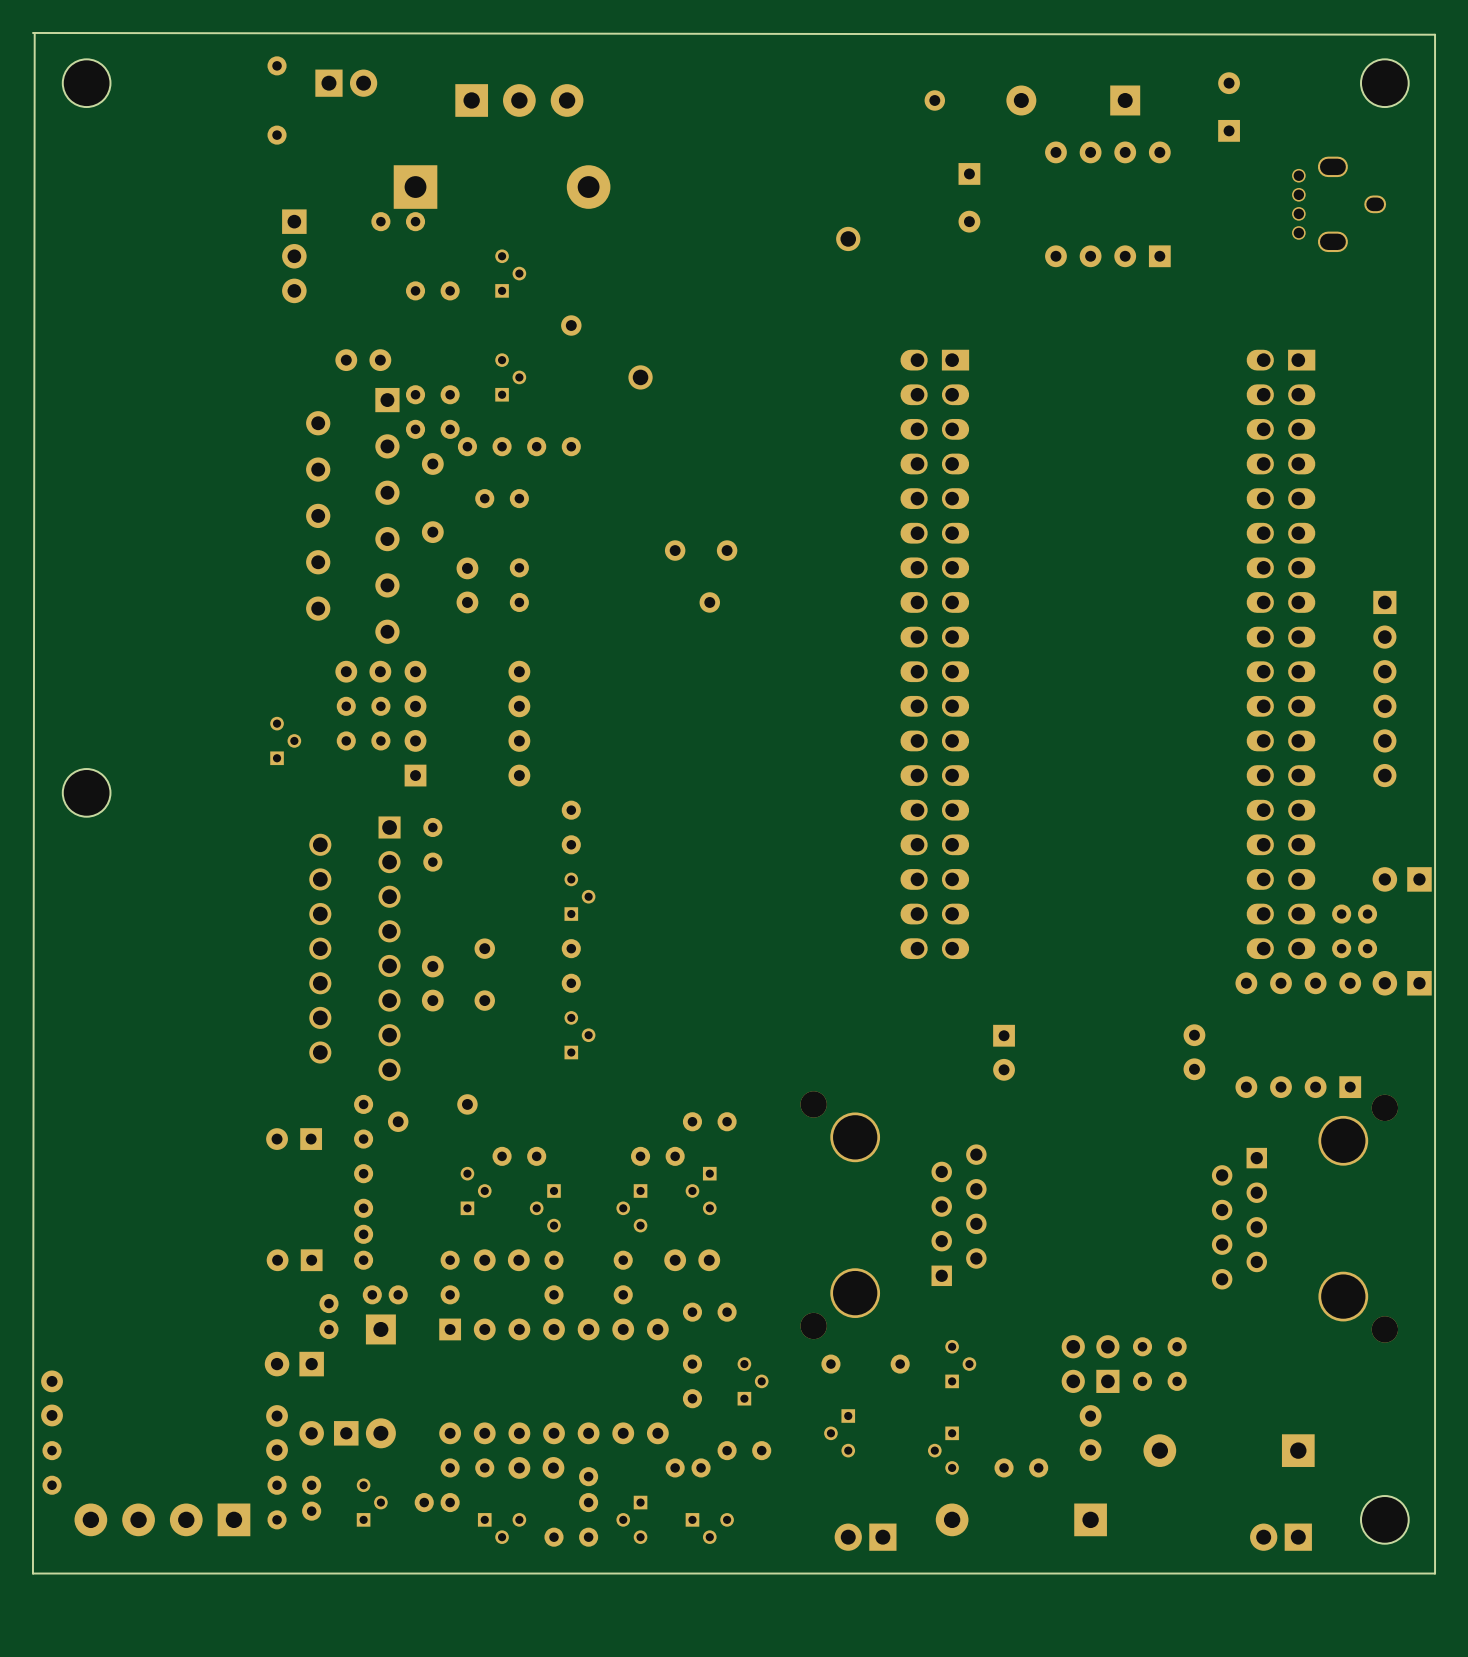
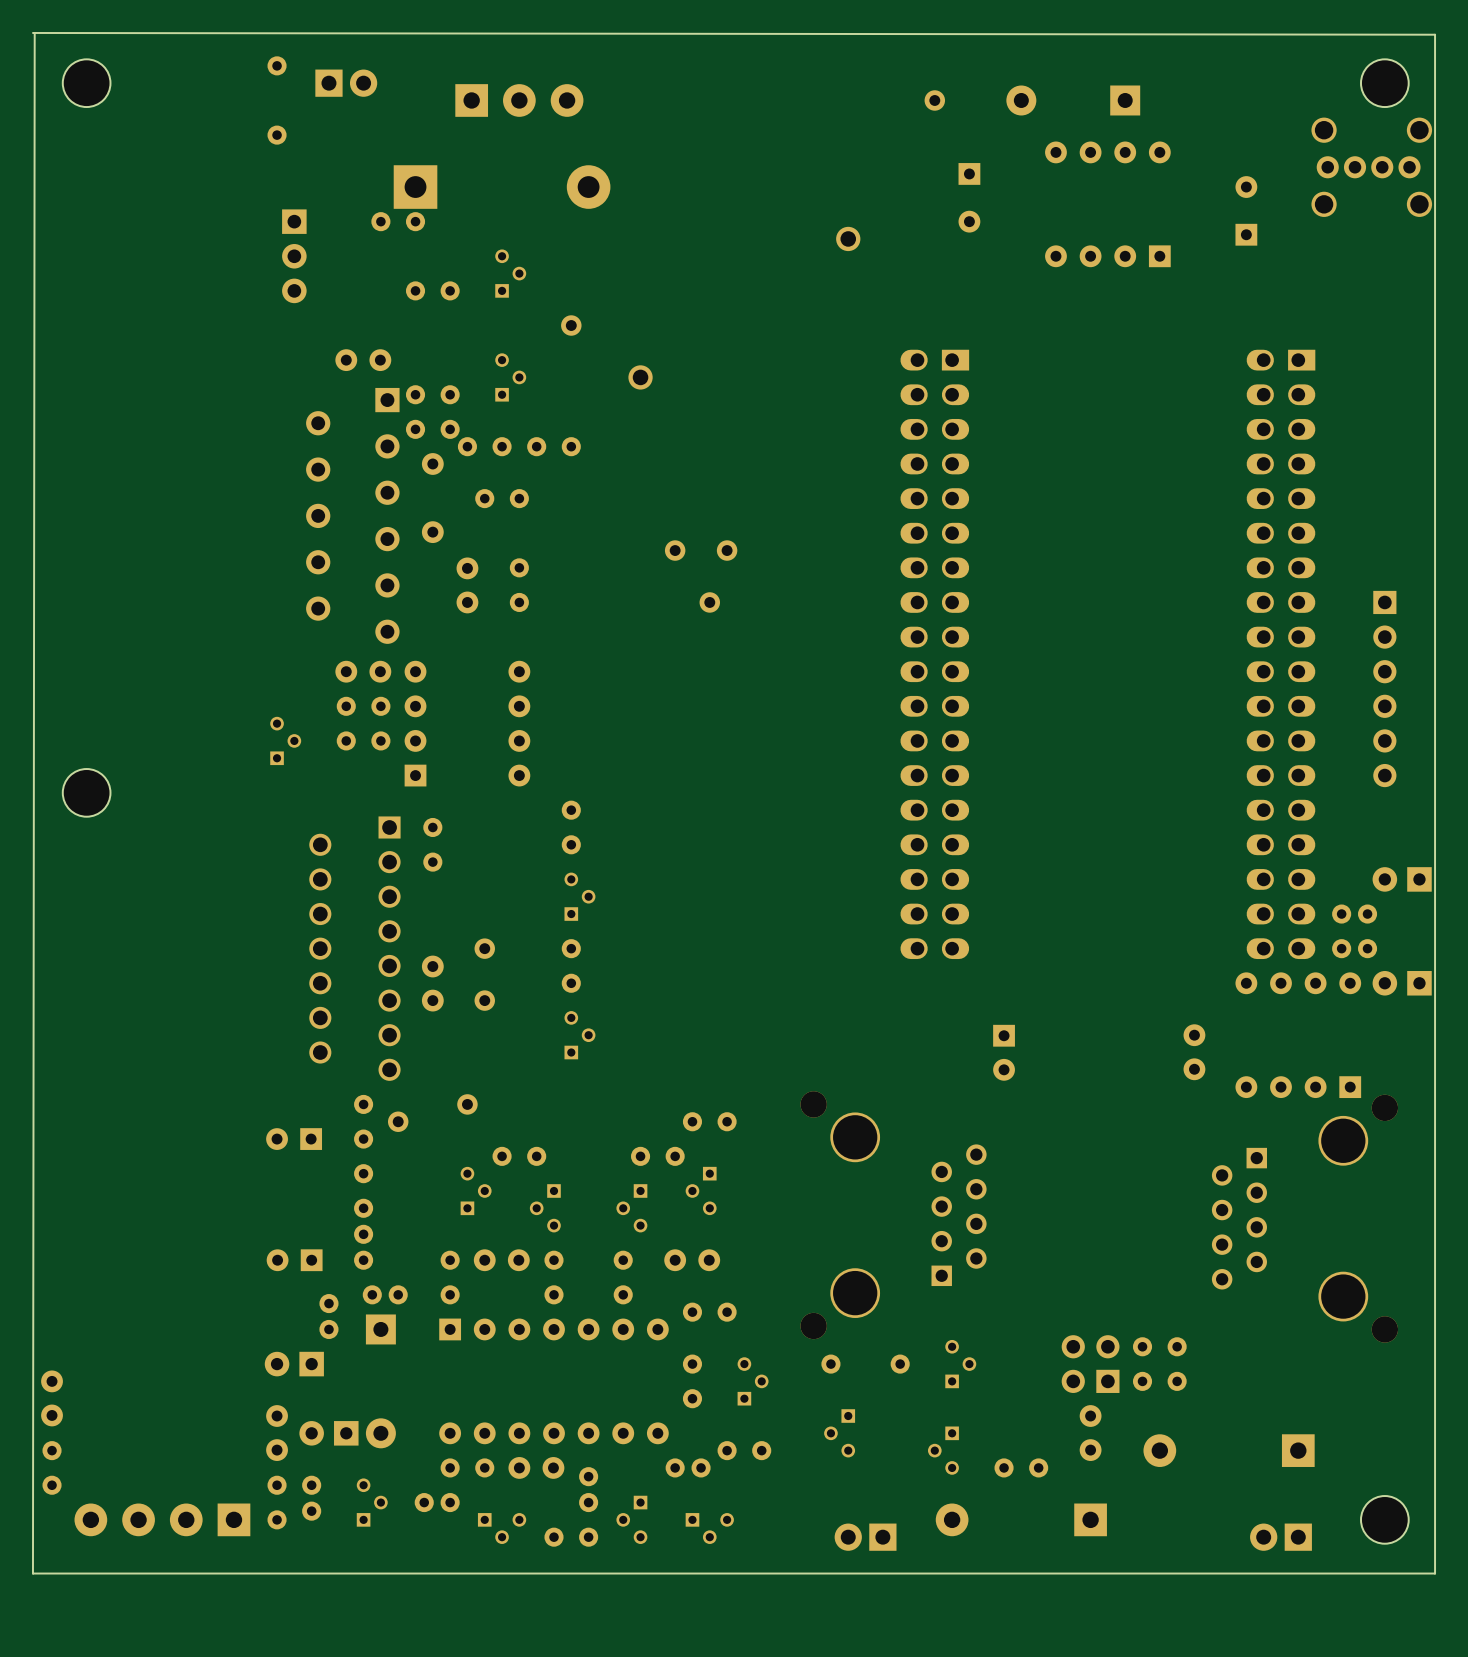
part position: (1229, 107) -> (1246, 210)
part: none -> (1371, 167)
part: (1339, 204) -> none

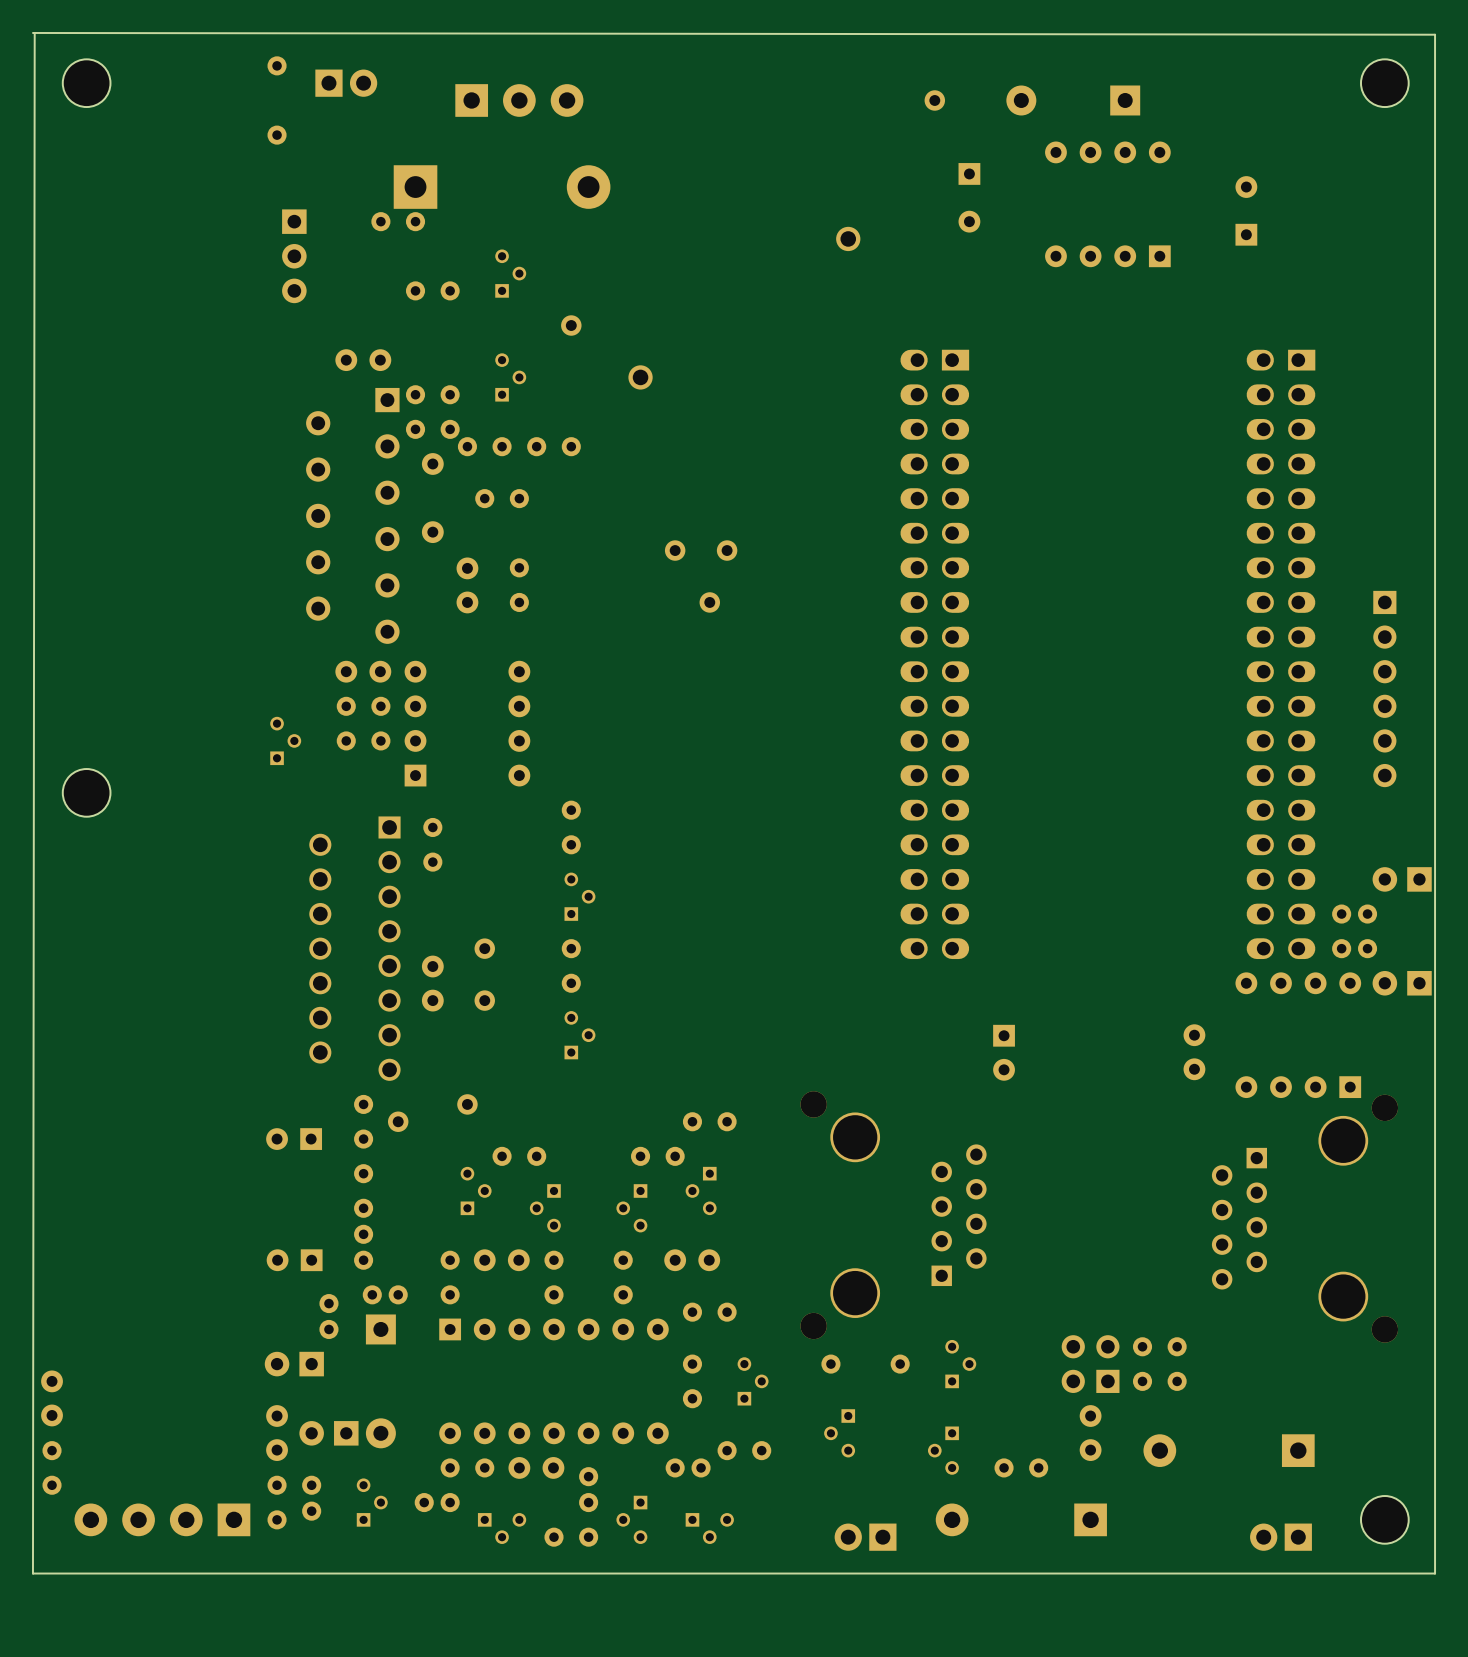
part: (1371, 167) -> none

